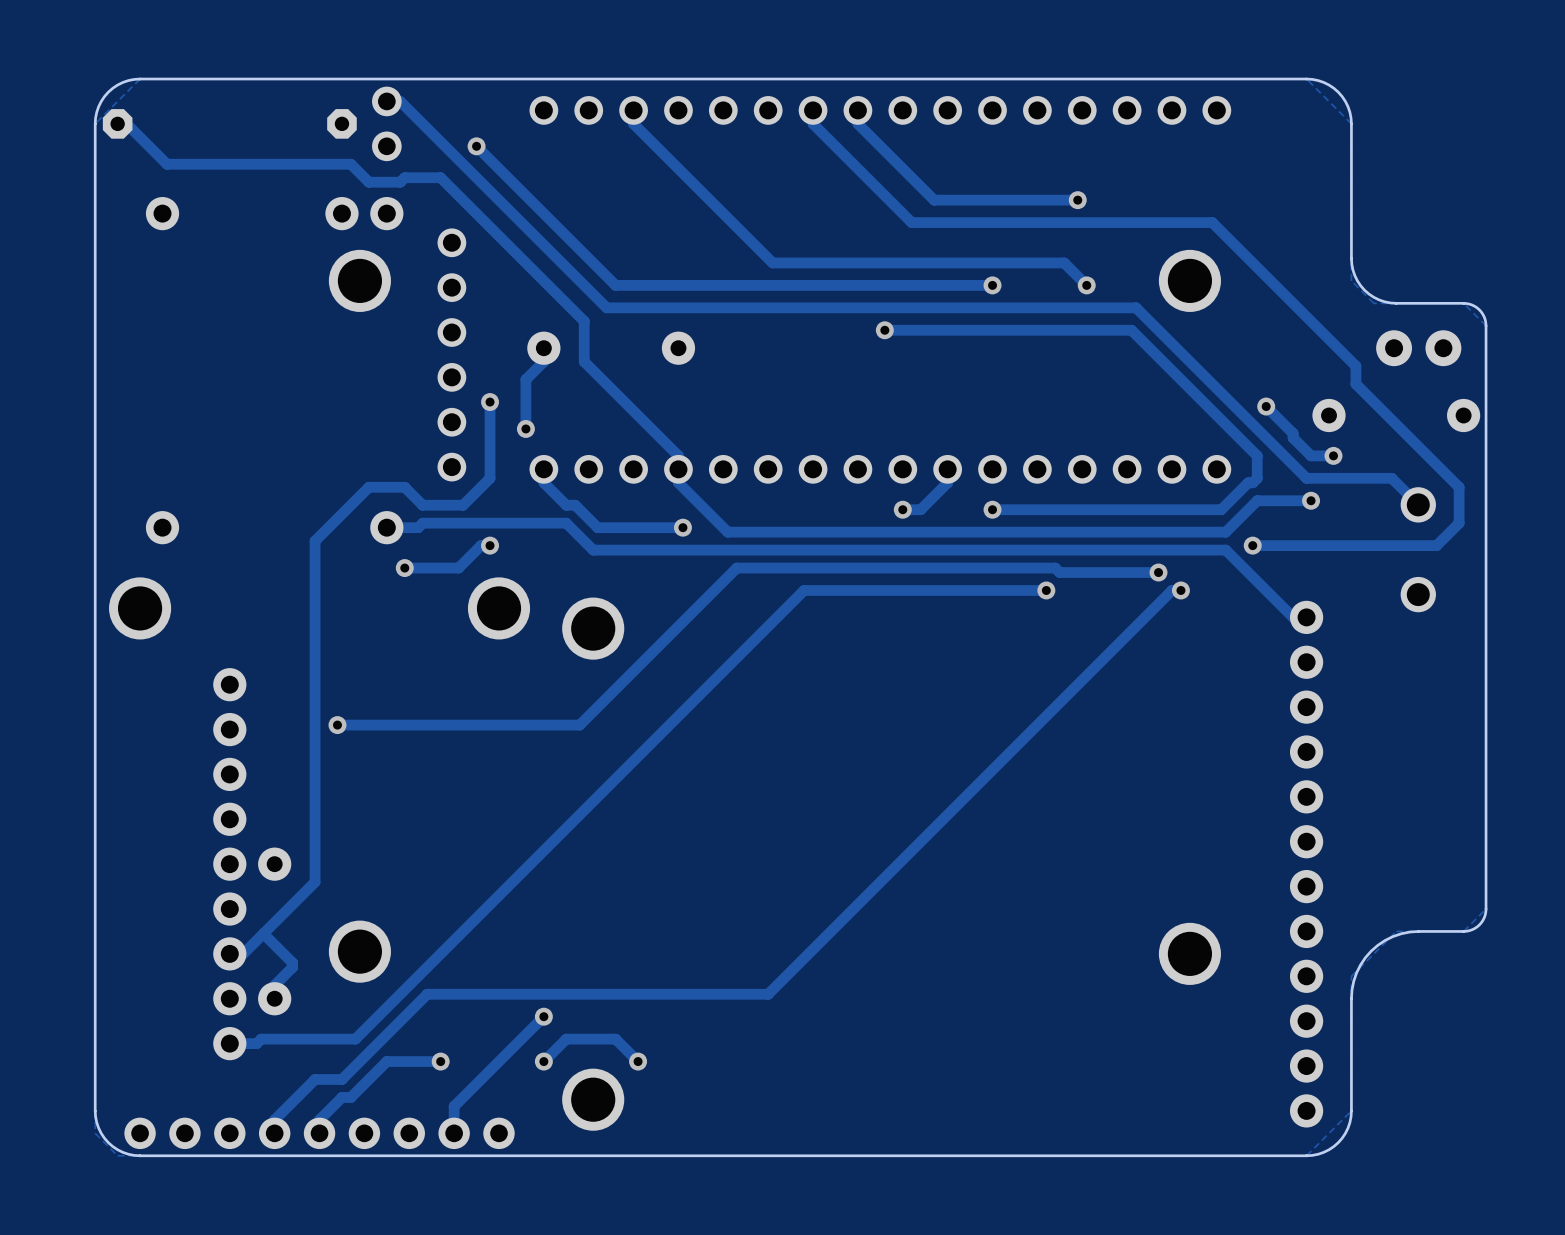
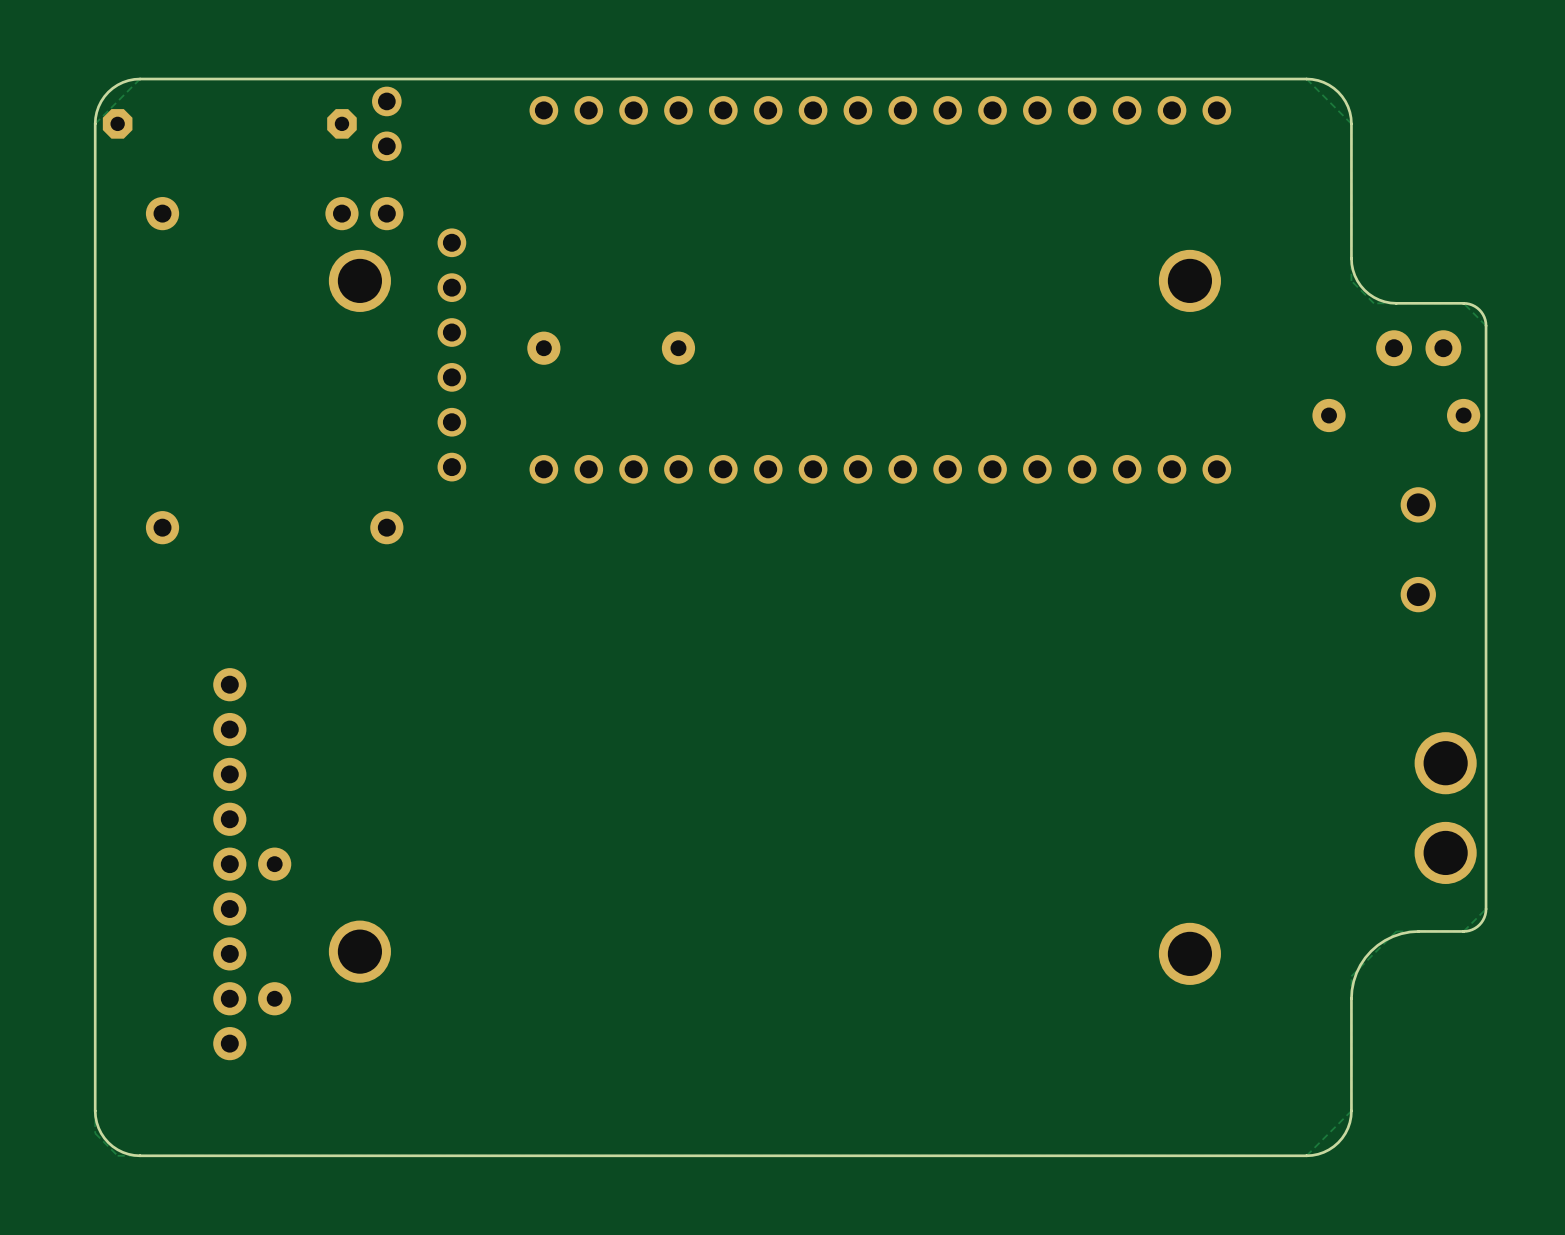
track: (386, 101) (400, 101) (606, 307) (1136, 307) (1306, 478) (1391, 478) (1418, 504) -> none
track: (633, 110) (633, 123) (772, 262) (1064, 262) (1086, 285) -> none
track: (813, 110) (813, 123) (911, 222) (1212, 222) (1355, 366) (1355, 384) (1459, 487) (1459, 523) (1436, 545) (1252, 545) -> none
track: (857, 110) (857, 123) (934, 200) (1077, 200) -> none
track: (117, 123) (126, 123) (167, 164) (350, 164) (368, 182) (400, 182) (404, 177) (440, 177) (584, 321) (584, 361) (678, 455) (678, 482) (727, 532) (1225, 532) (1257, 500) (1311, 500) -> none
track: (476, 146) (615, 285) (992, 285) -> none
via: (476, 146) -> none
via: (1077, 200) -> none
via: (992, 285) -> none
via: (1086, 285) -> none
track: (884, 330) (1131, 330) (1257, 455) (1257, 478) (1252, 482) (1248, 482) (1221, 509) (992, 509) -> none
via: (884, 330) -> none
track: (543, 348) (543, 361) (525, 379) (525, 428) -> none
track: (490, 402) (490, 478) (463, 505) (422, 505) (404, 487) (368, 487) (315, 541) (315, 882) (243, 953) (229, 953) -> none
via: (490, 402) -> none
track: (1266, 406) (1293, 433) (1293, 437) (1311, 455) (1333, 455) -> none
via: (1266, 406) -> none
via: (525, 428) -> none
via: (1333, 455) -> none
track: (543, 469) (543, 482) (566, 505) (575, 505) (597, 527) (682, 527) -> none
track: (947, 469) (947, 482) (920, 509) (902, 509) -> none
via: (1311, 500) -> none
via: (902, 509) -> none
via: (992, 509) -> none
track: (386, 527) (418, 527) (422, 523) (566, 523) (593, 550) (1225, 550) (1293, 617) (1306, 617) -> none
via: (682, 527) -> none
track: (490, 545) (481, 545) (458, 568) (404, 568) -> none
via: (490, 545) -> none
via: (1252, 545) -> none
via: (404, 568) -> none
track: (1158, 572) (1059, 572) (1055, 568) (736, 568) (579, 725) (337, 725) -> none
via: (1158, 572) -> none
track: (1046, 590) (804, 590) (355, 1039) (261, 1039) (256, 1043) (229, 1043) -> none
via: (1046, 590) -> none
track: (1180, 590) (1171, 590) (768, 994) (427, 994) (341, 1079) (315, 1079) (274, 1119) (274, 1133) -> none
via: (1180, 590) -> none
part: (140, 608) -> none
part: (499, 608) -> none
part: (593, 628) -> none
via: (337, 725) -> none
part: none -> (1445, 763)
part: none -> (1445, 852)
part: (1306, 864) -> none
track: (263, 933) (292, 962) (292, 967) (274, 985) (274, 998) -> none
track: (543, 1016) (454, 1106) (454, 1133) -> none
via: (543, 1016) -> none
track: (440, 1061) (386, 1061) (350, 1097) (341, 1097) (319, 1119) (319, 1133) -> none
via: (440, 1061) -> none
via: (543, 1061) -> none
track: (638, 1061) (615, 1039) (566, 1039) (543, 1061) -> none
via: (638, 1061) -> none
part: (593, 1099) -> none
part: (319, 1133) -> none

